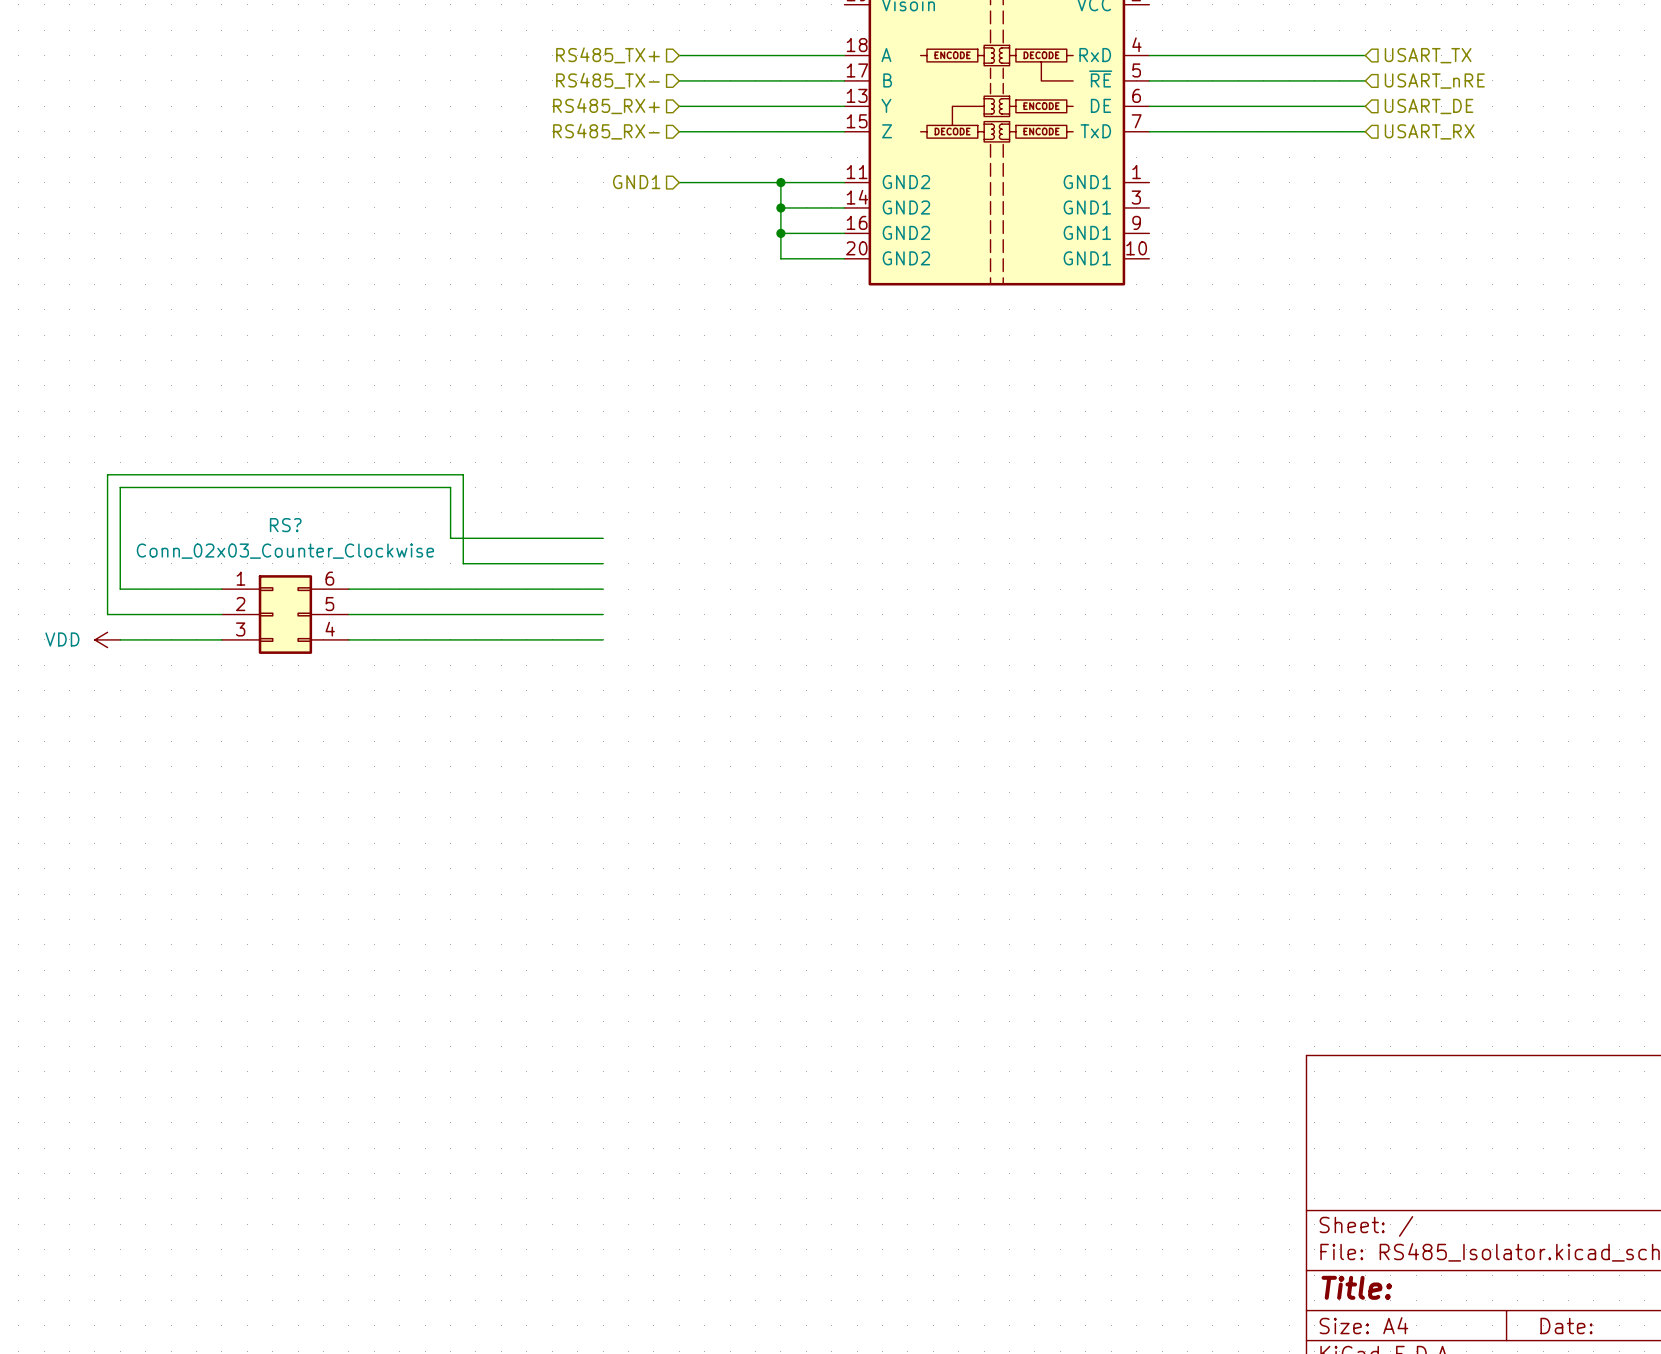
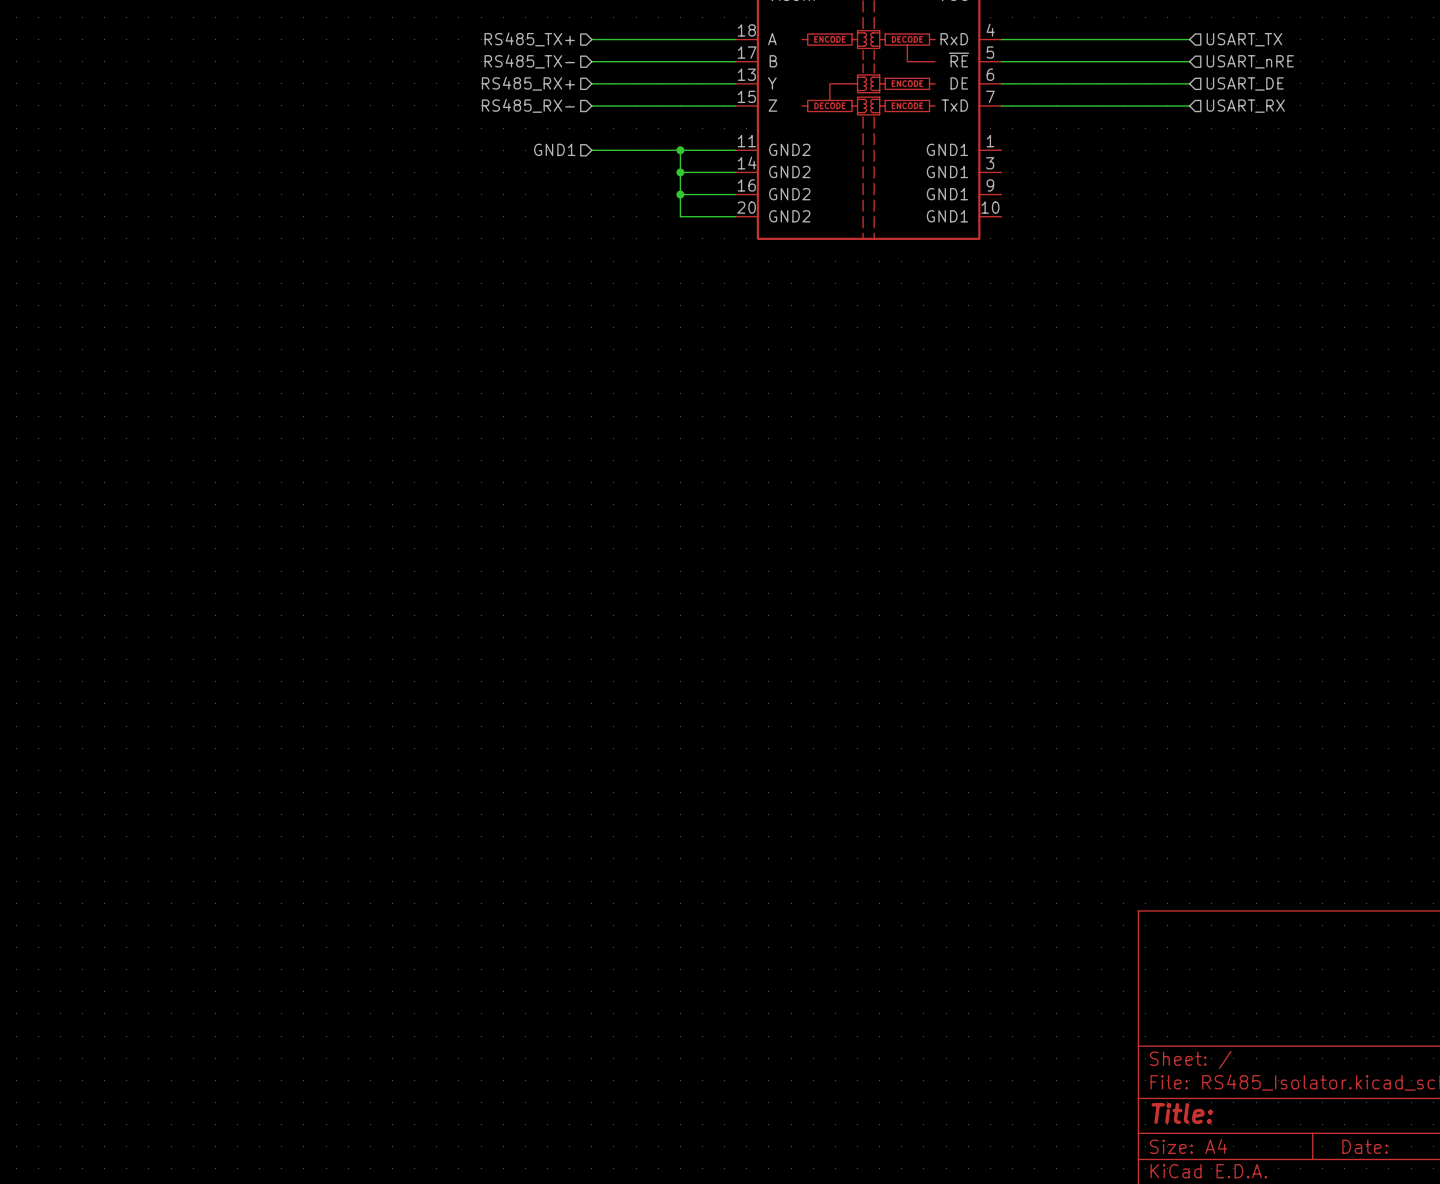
wire: (603, 538) (450, 538) (450, 487) (120, 487) (120, 589) (221, 589) -> none
wire: (603, 563) (463, 563) (463, 474) (107, 474) (107, 614) (221, 614) -> none
wire: (348, 589) (603, 589) -> none
RS?: Conn_02x03_Counter_Clockwise (285, 614) -> none
wire: (348, 614) (603, 614) -> none
power symbol: VDD (107, 639) -> none
wire: (120, 639) (221, 639) -> none
wire: (348, 639) (603, 639) -> none

